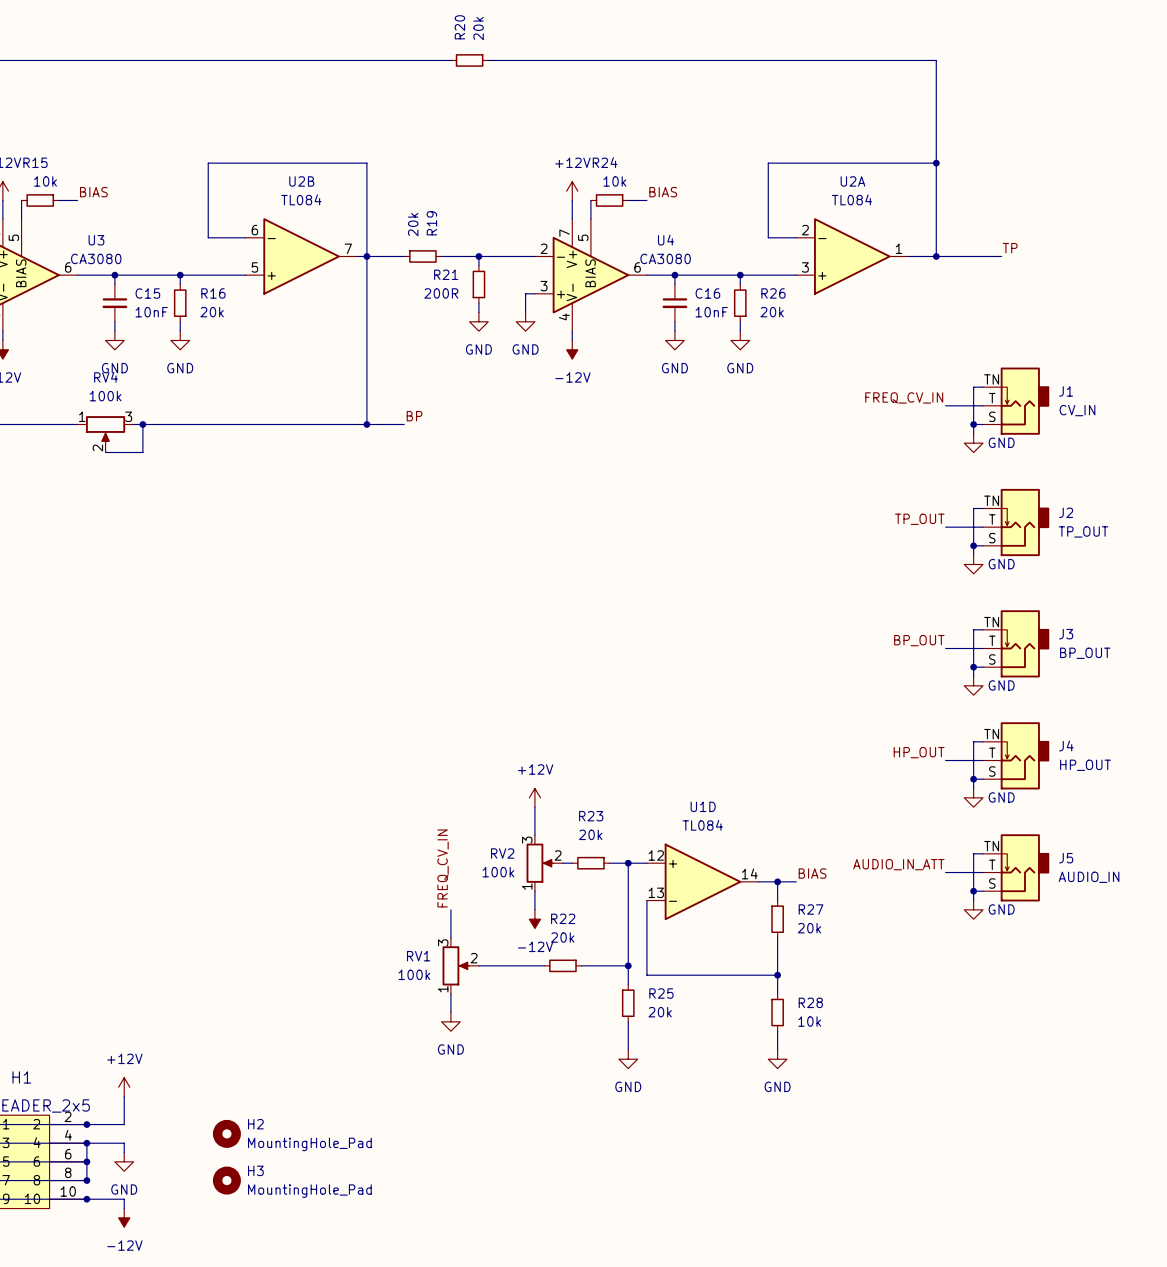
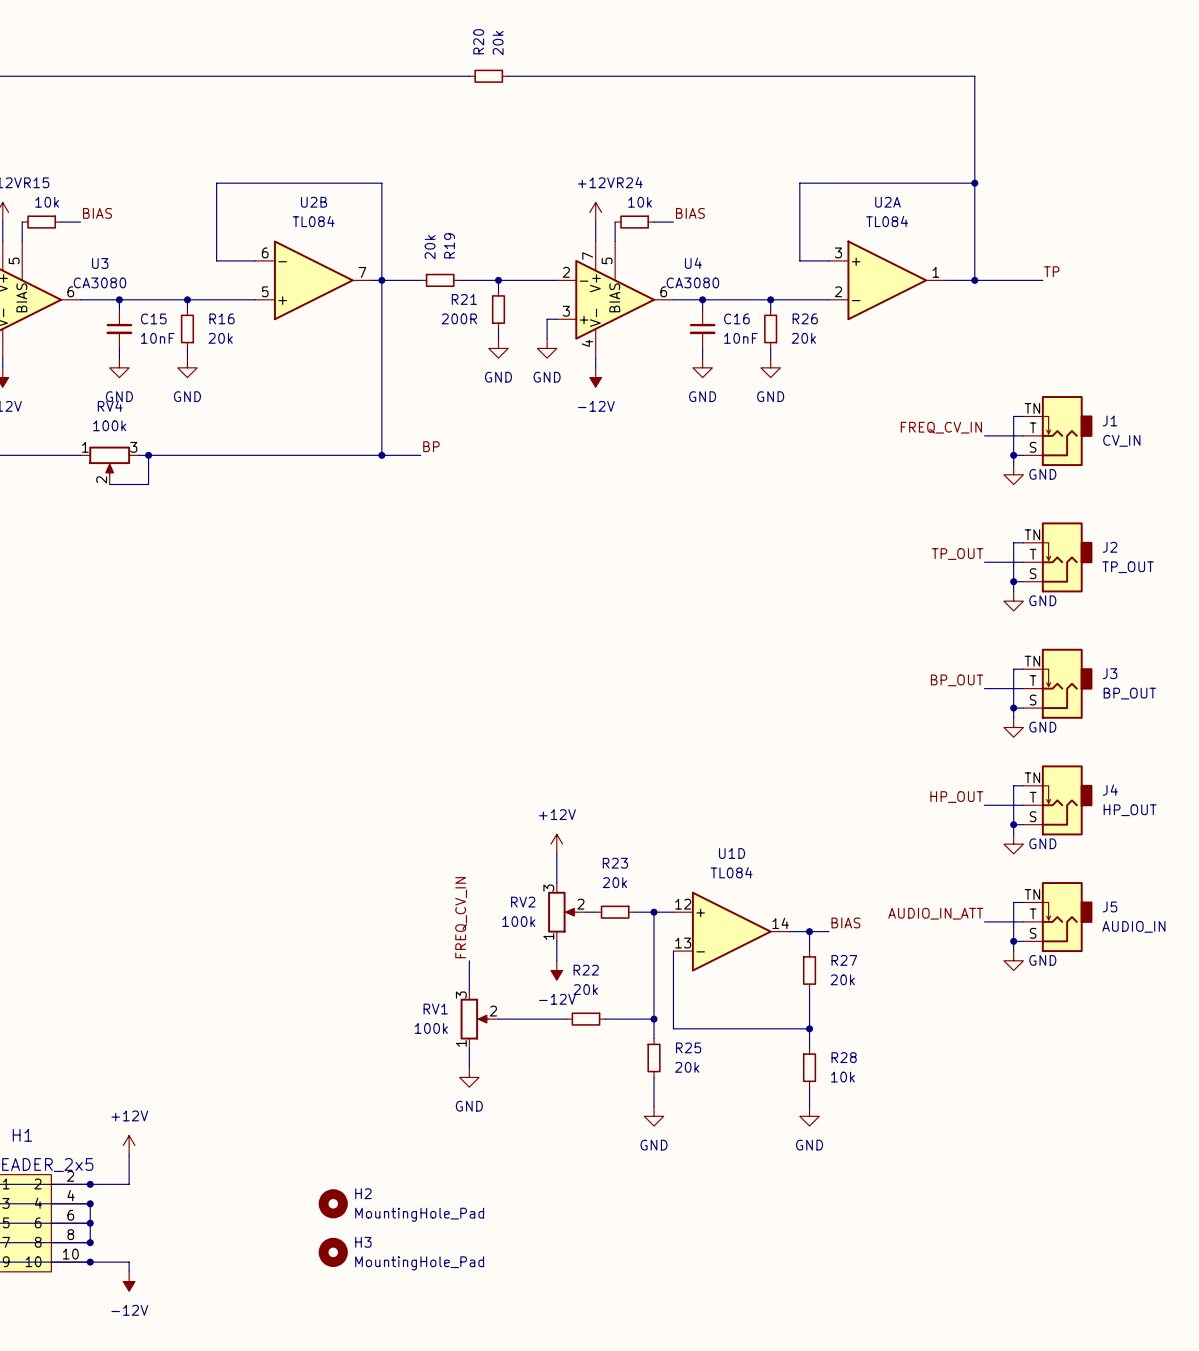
U2A flip: as is (852, 256) -> up-down (887, 280)
H2 position: (226, 1133) -> (333, 1203)
wire: (86, 1143) (124, 1143) (124, 1152) -> none
power symbol: GND (124, 1161) -> none
H3 position: (226, 1180) -> (333, 1252)

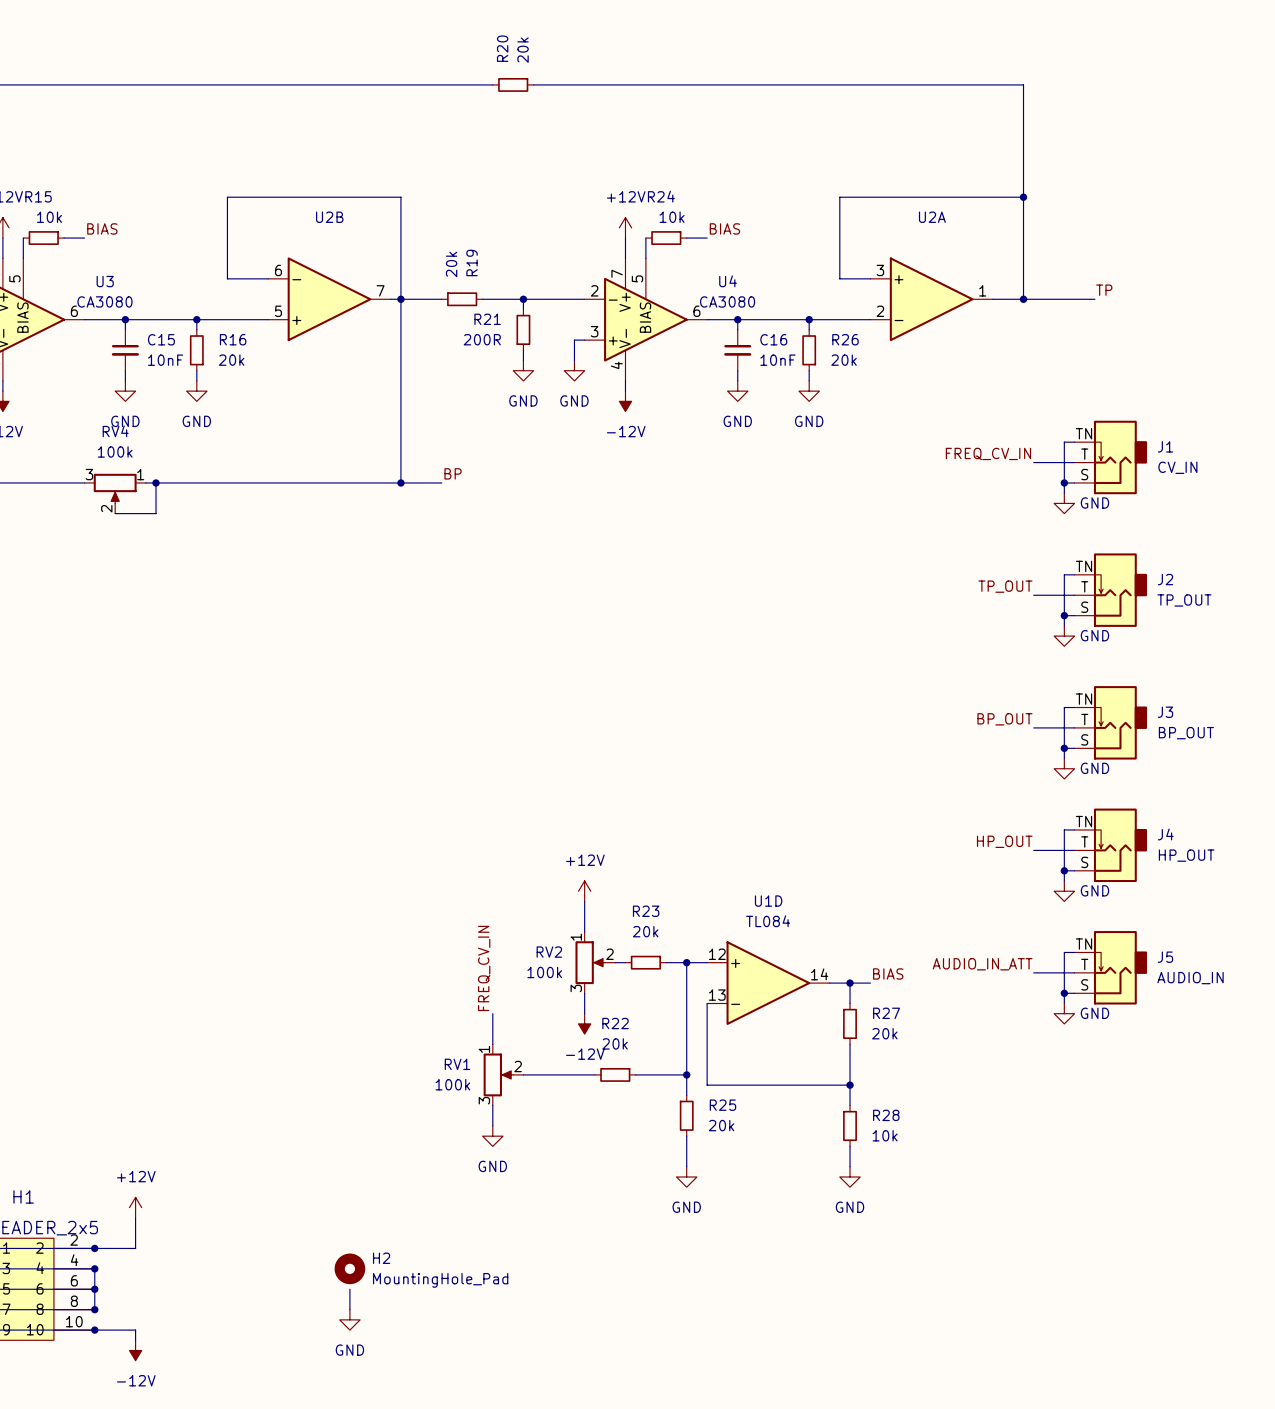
U2B value: TL084 (313, 221) -> none
U2A value: TL084 (887, 221) -> none
RV4 flip: as is (109, 460) -> left-right (115, 488)
RV2 flip: as is (562, 912) -> up-down (590, 962)
RV1 flip: as is (474, 1019) -> up-down (498, 1074)
wire: none -> (349, 1289) (349, 1309)
H3: MountingHole_Pad (333, 1252) -> none
power symbol: none -> GND (349, 1319)

